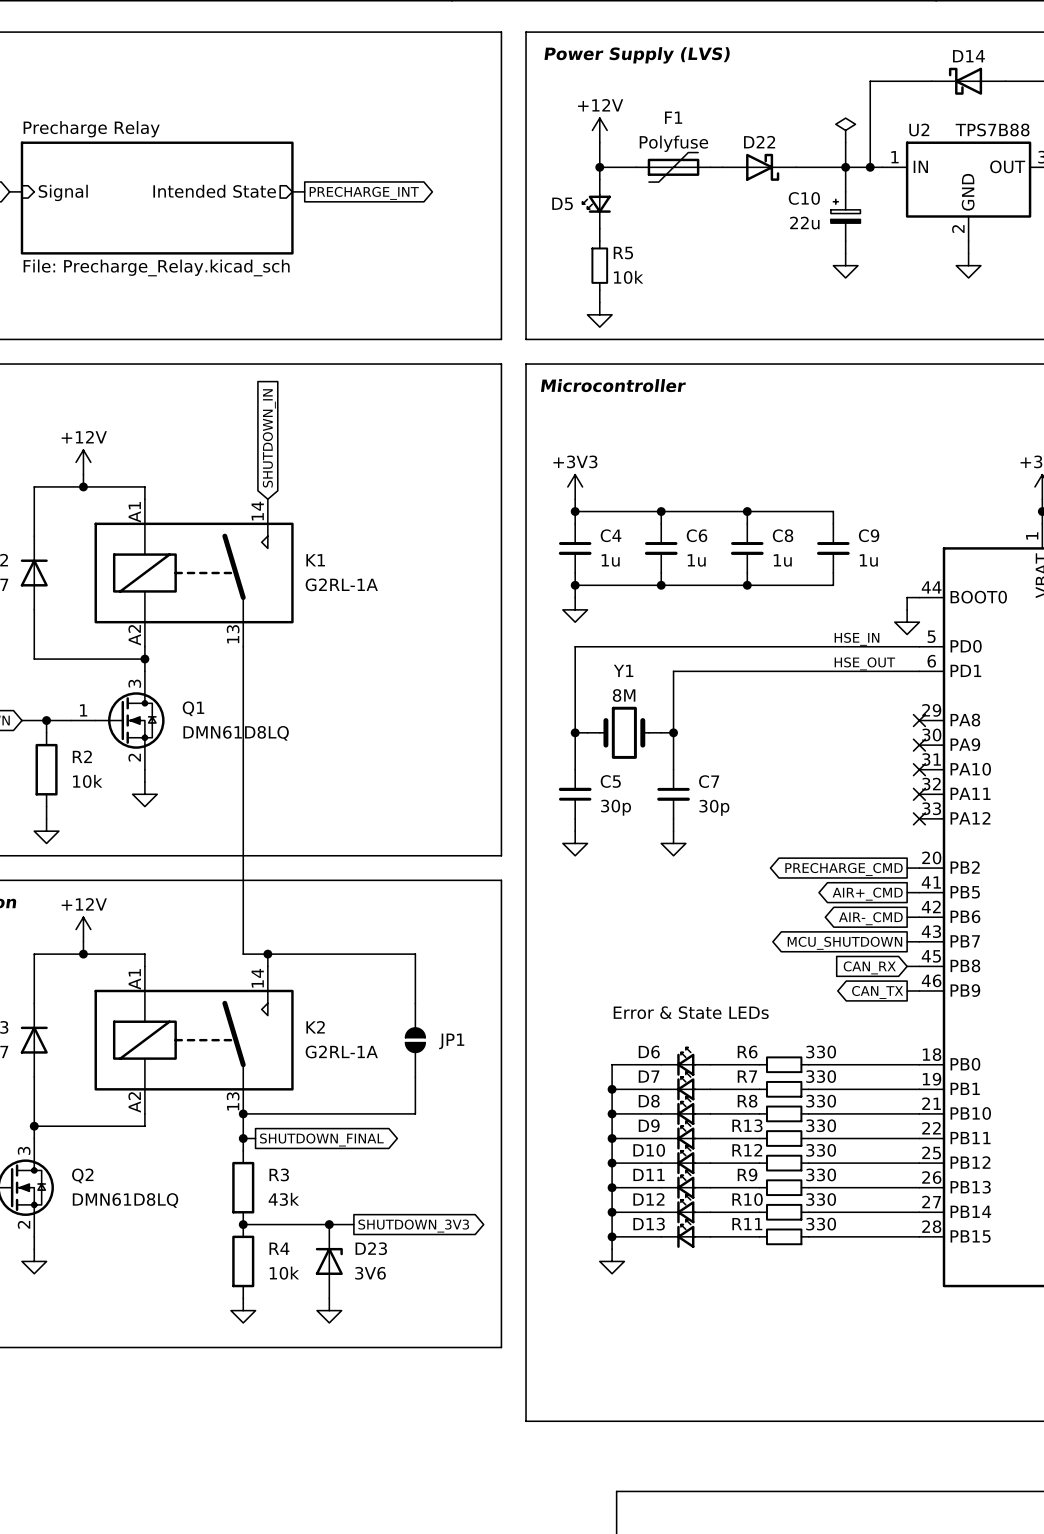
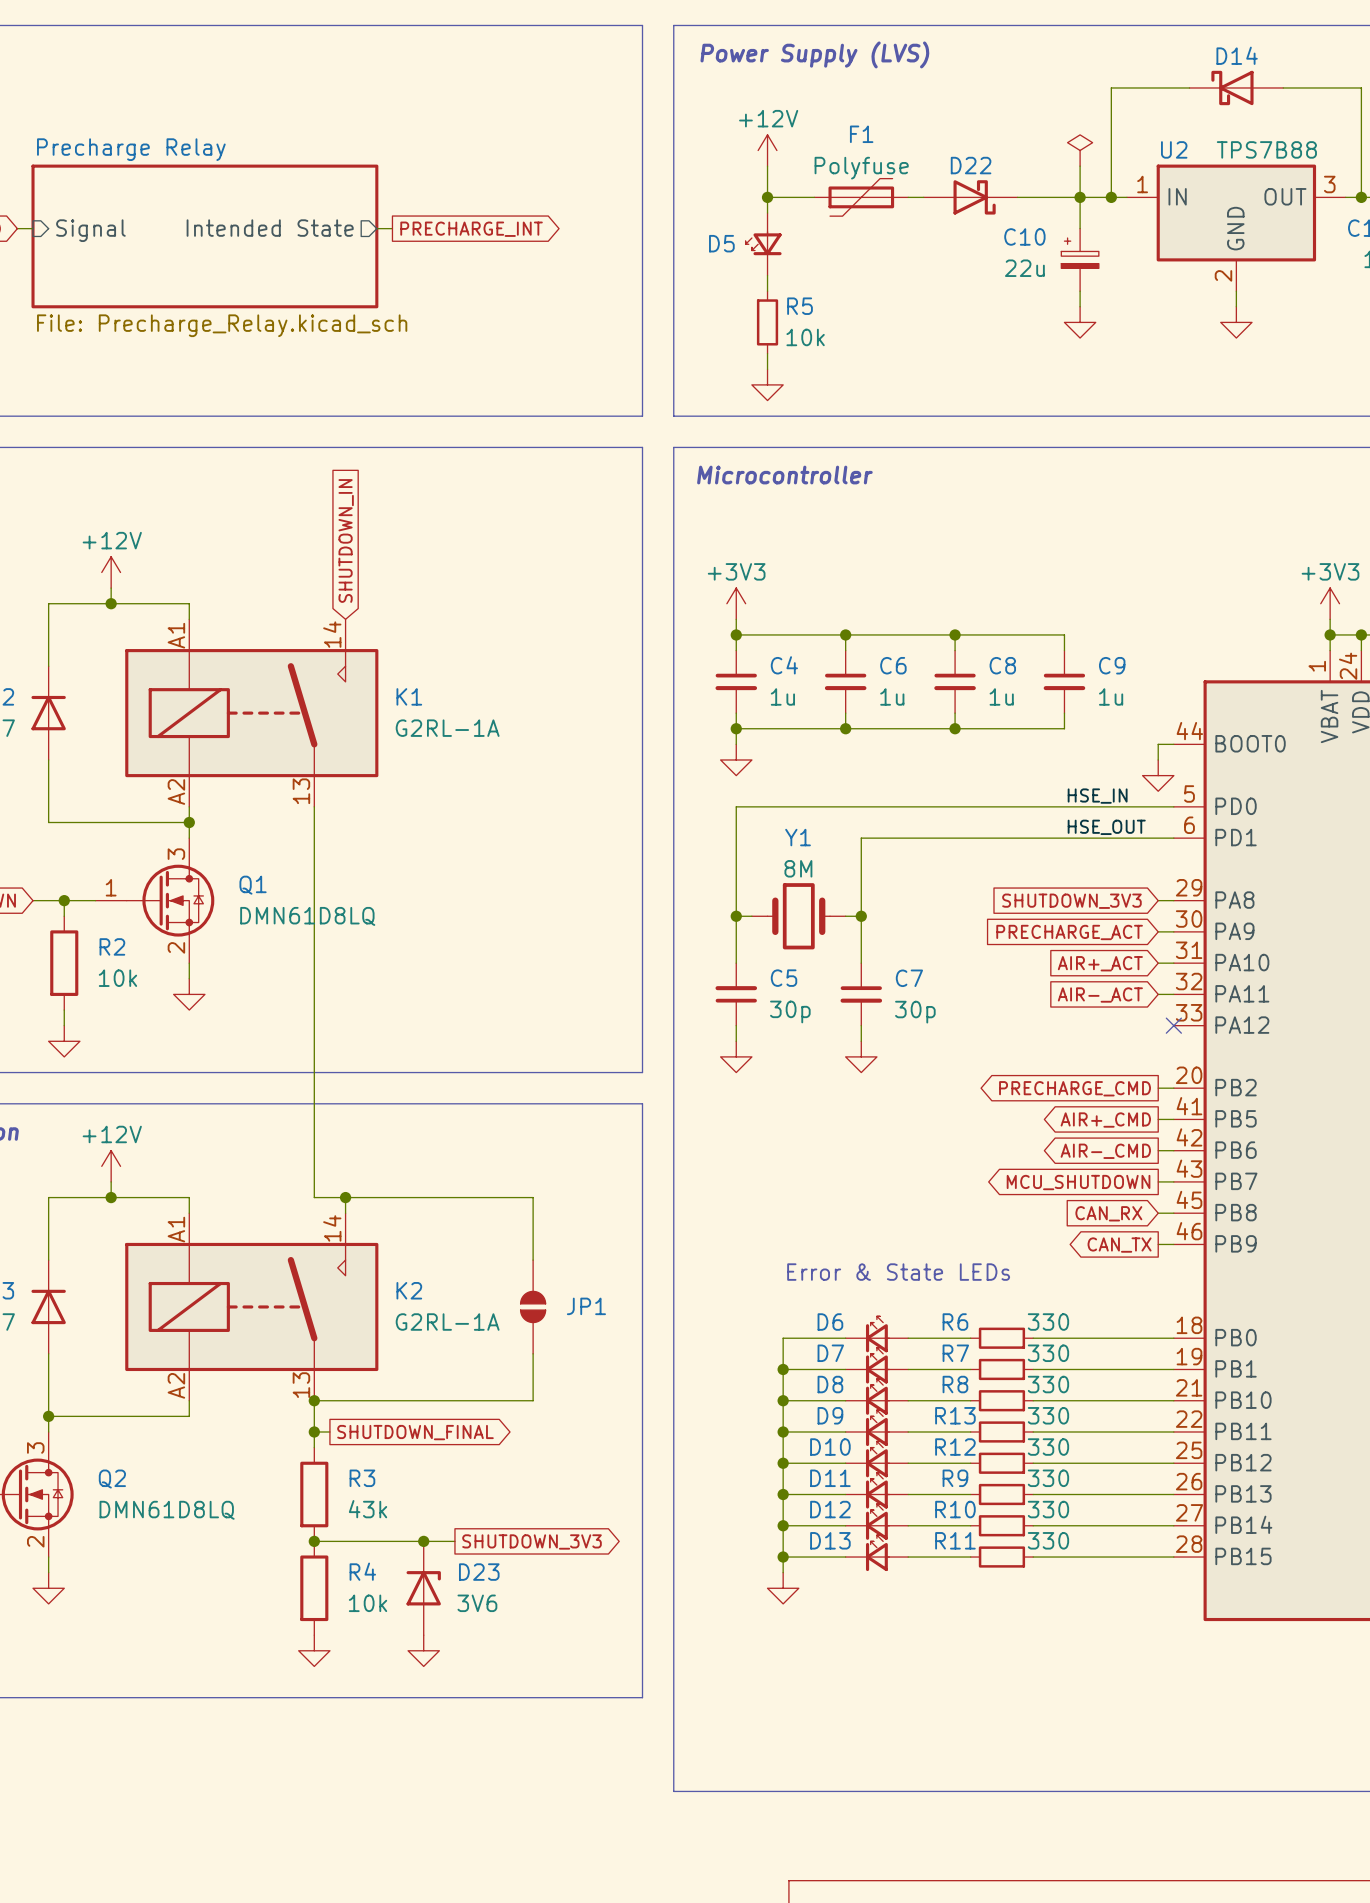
wire: none -> (1158, 900) (1173, 900)
no-connect mark: (919, 720) -> none
global label: none -> SHUTDOWN_3V3 (1071, 901)
wire: none -> (1158, 931) (1173, 931)
no-connect mark: (919, 745) -> none
global label: none -> PRECHARGE_ACT (1069, 932)
wire: none -> (1158, 963) (1173, 963)
no-connect mark: (919, 769) -> none
global label: none -> AIR+_ACT (1100, 963)
wire: none -> (1158, 994) (1173, 994)
no-connect mark: (919, 794) -> none
global label: none -> AIR-_ACT (1100, 994)

